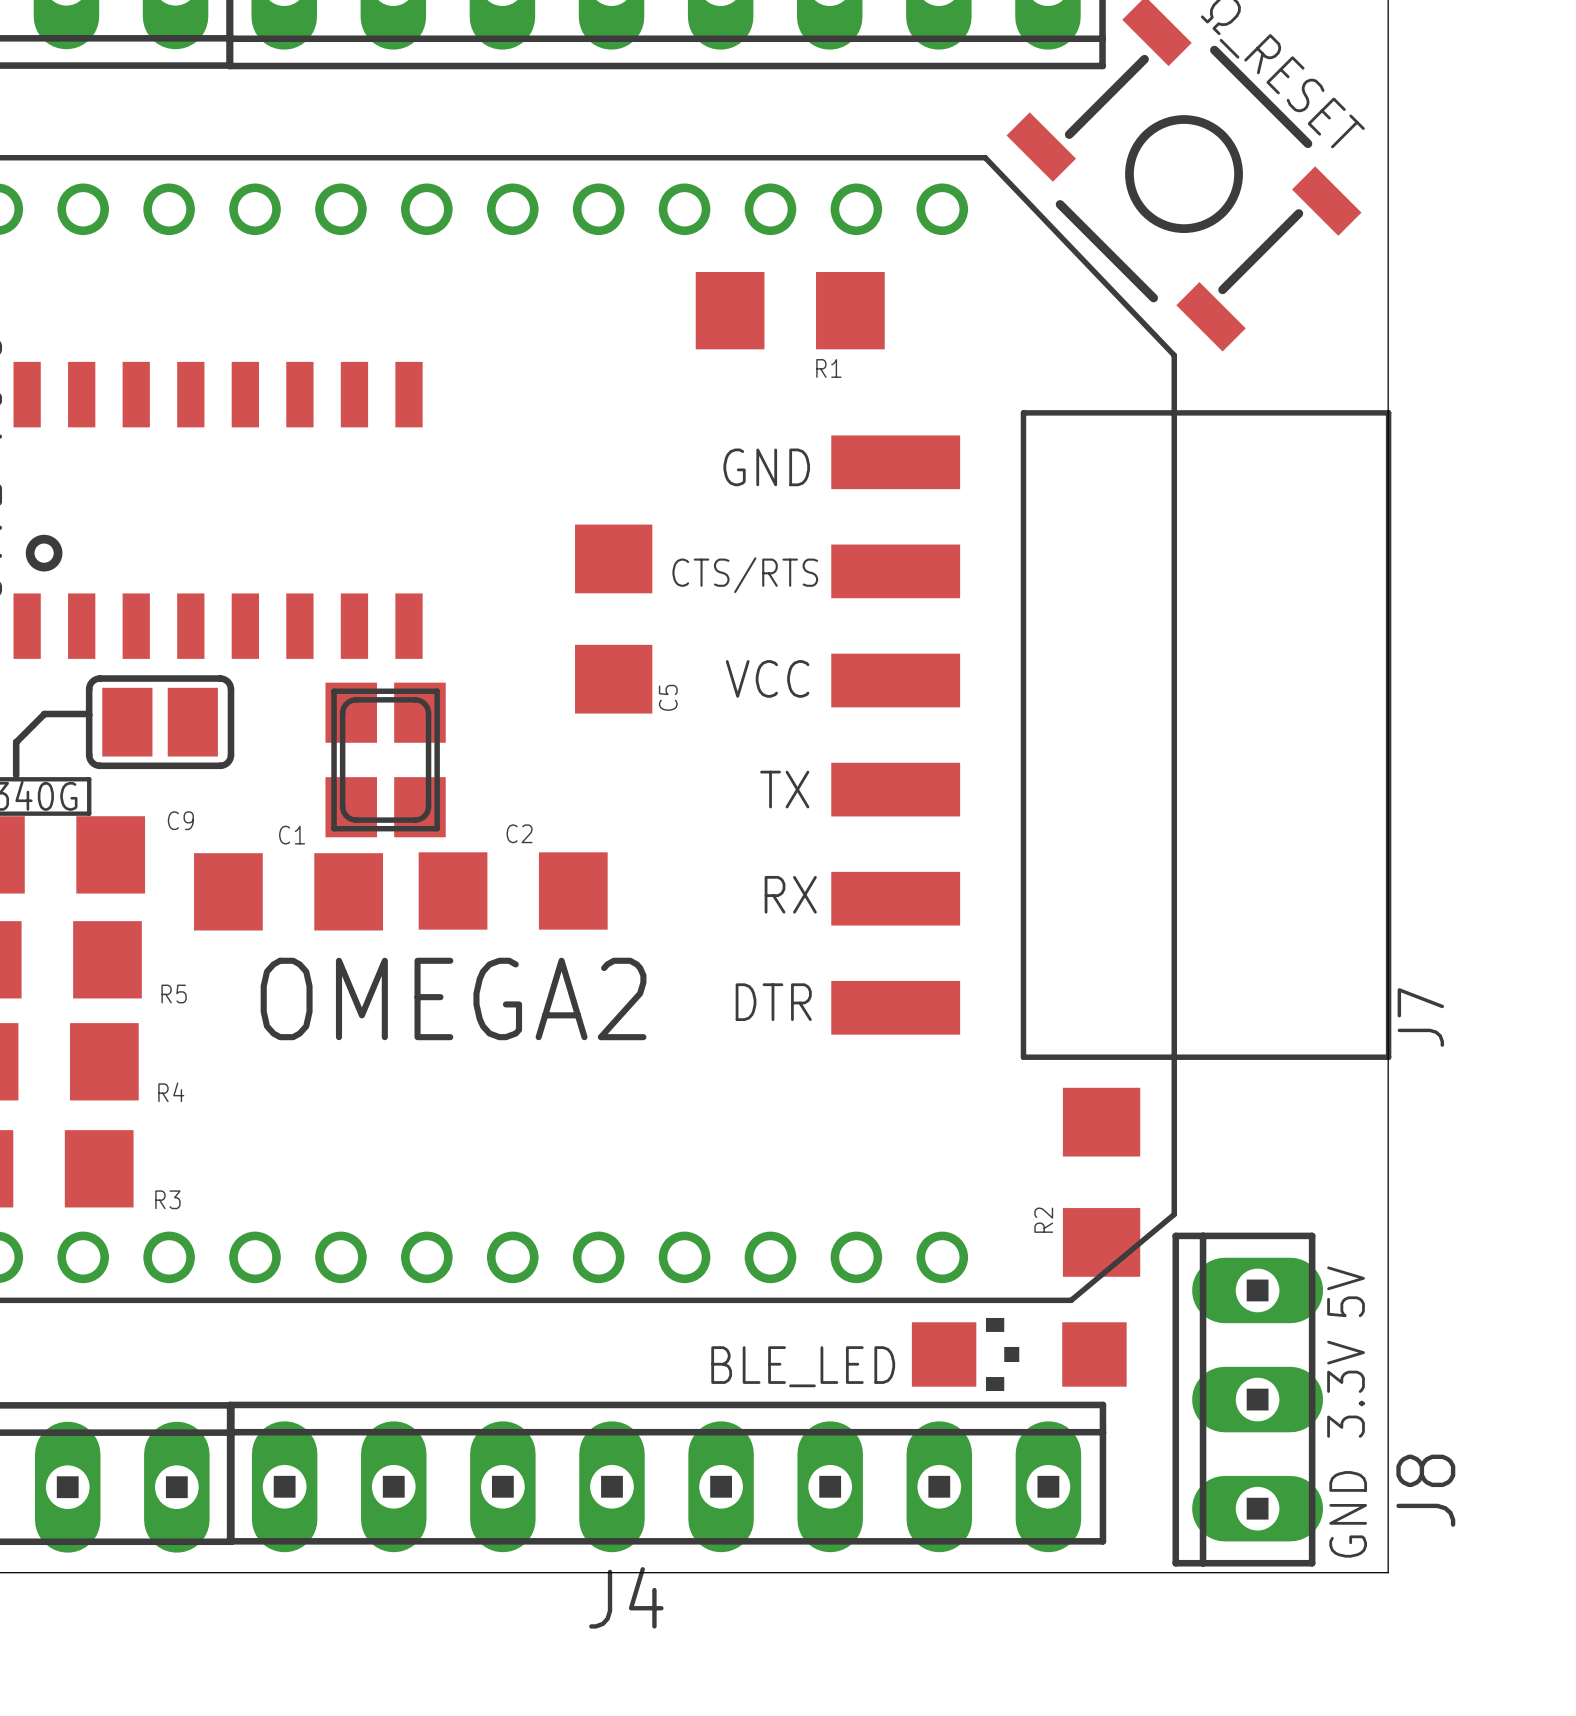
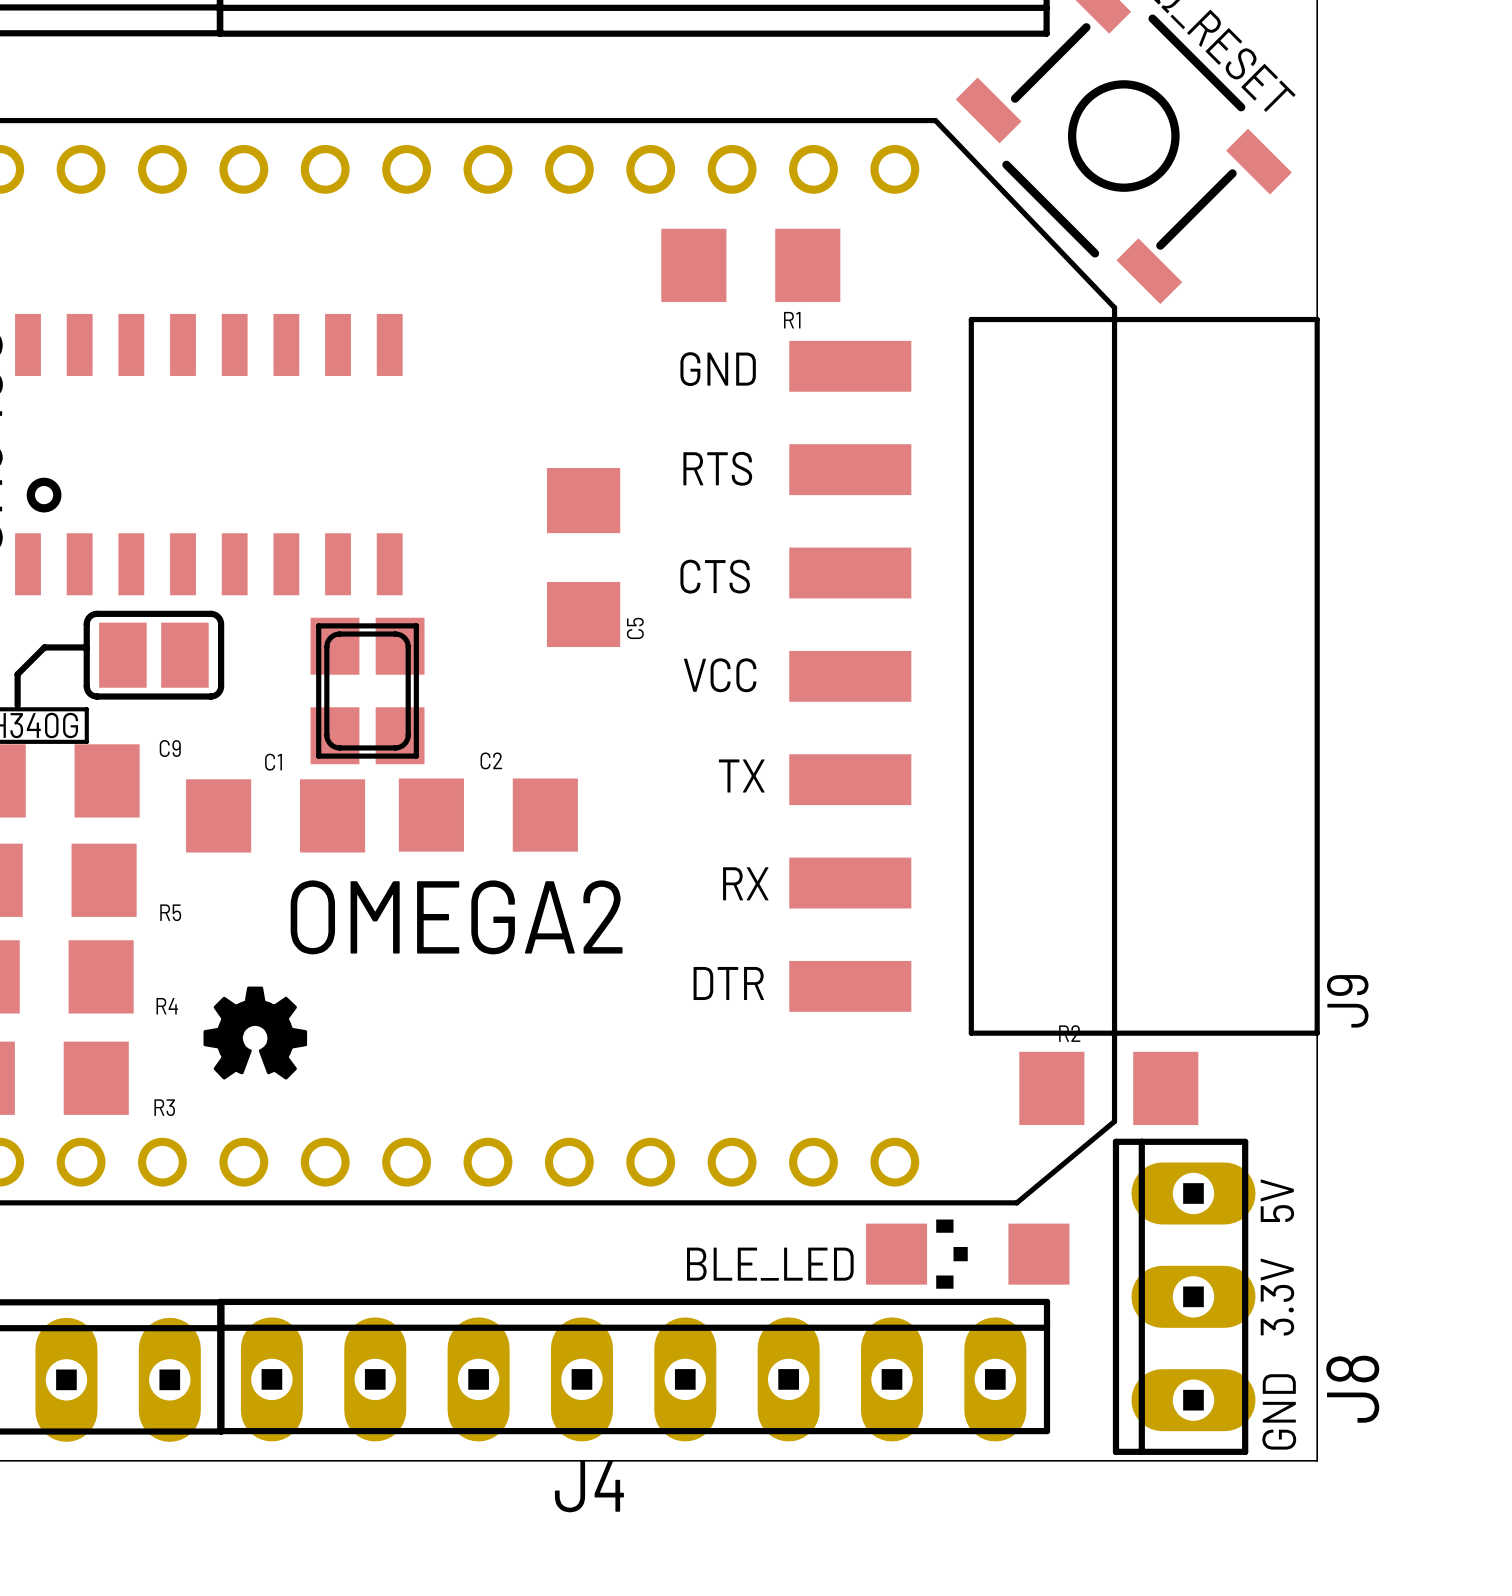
text position: GND (766, 467) -> GND (718, 369)
text: none -> RTS (717, 468)
text: CTS/RTS (745, 575) -> none
text: none -> CTS (715, 576)
text position: VCC (767, 678) -> VCC (720, 675)
J7: (1111, 735) -> none
J9: none -> (1054, 676)
text position: TX (784, 789) -> TX (741, 775)
text position: RX (790, 894) -> RX (745, 883)
text position: DTR (773, 1002) -> DTR (728, 983)
drawing: none -> [203, 986, 308, 1080]
R2 rotation: 0° (1101, 1182) -> 90° clockwise (1108, 1088)

